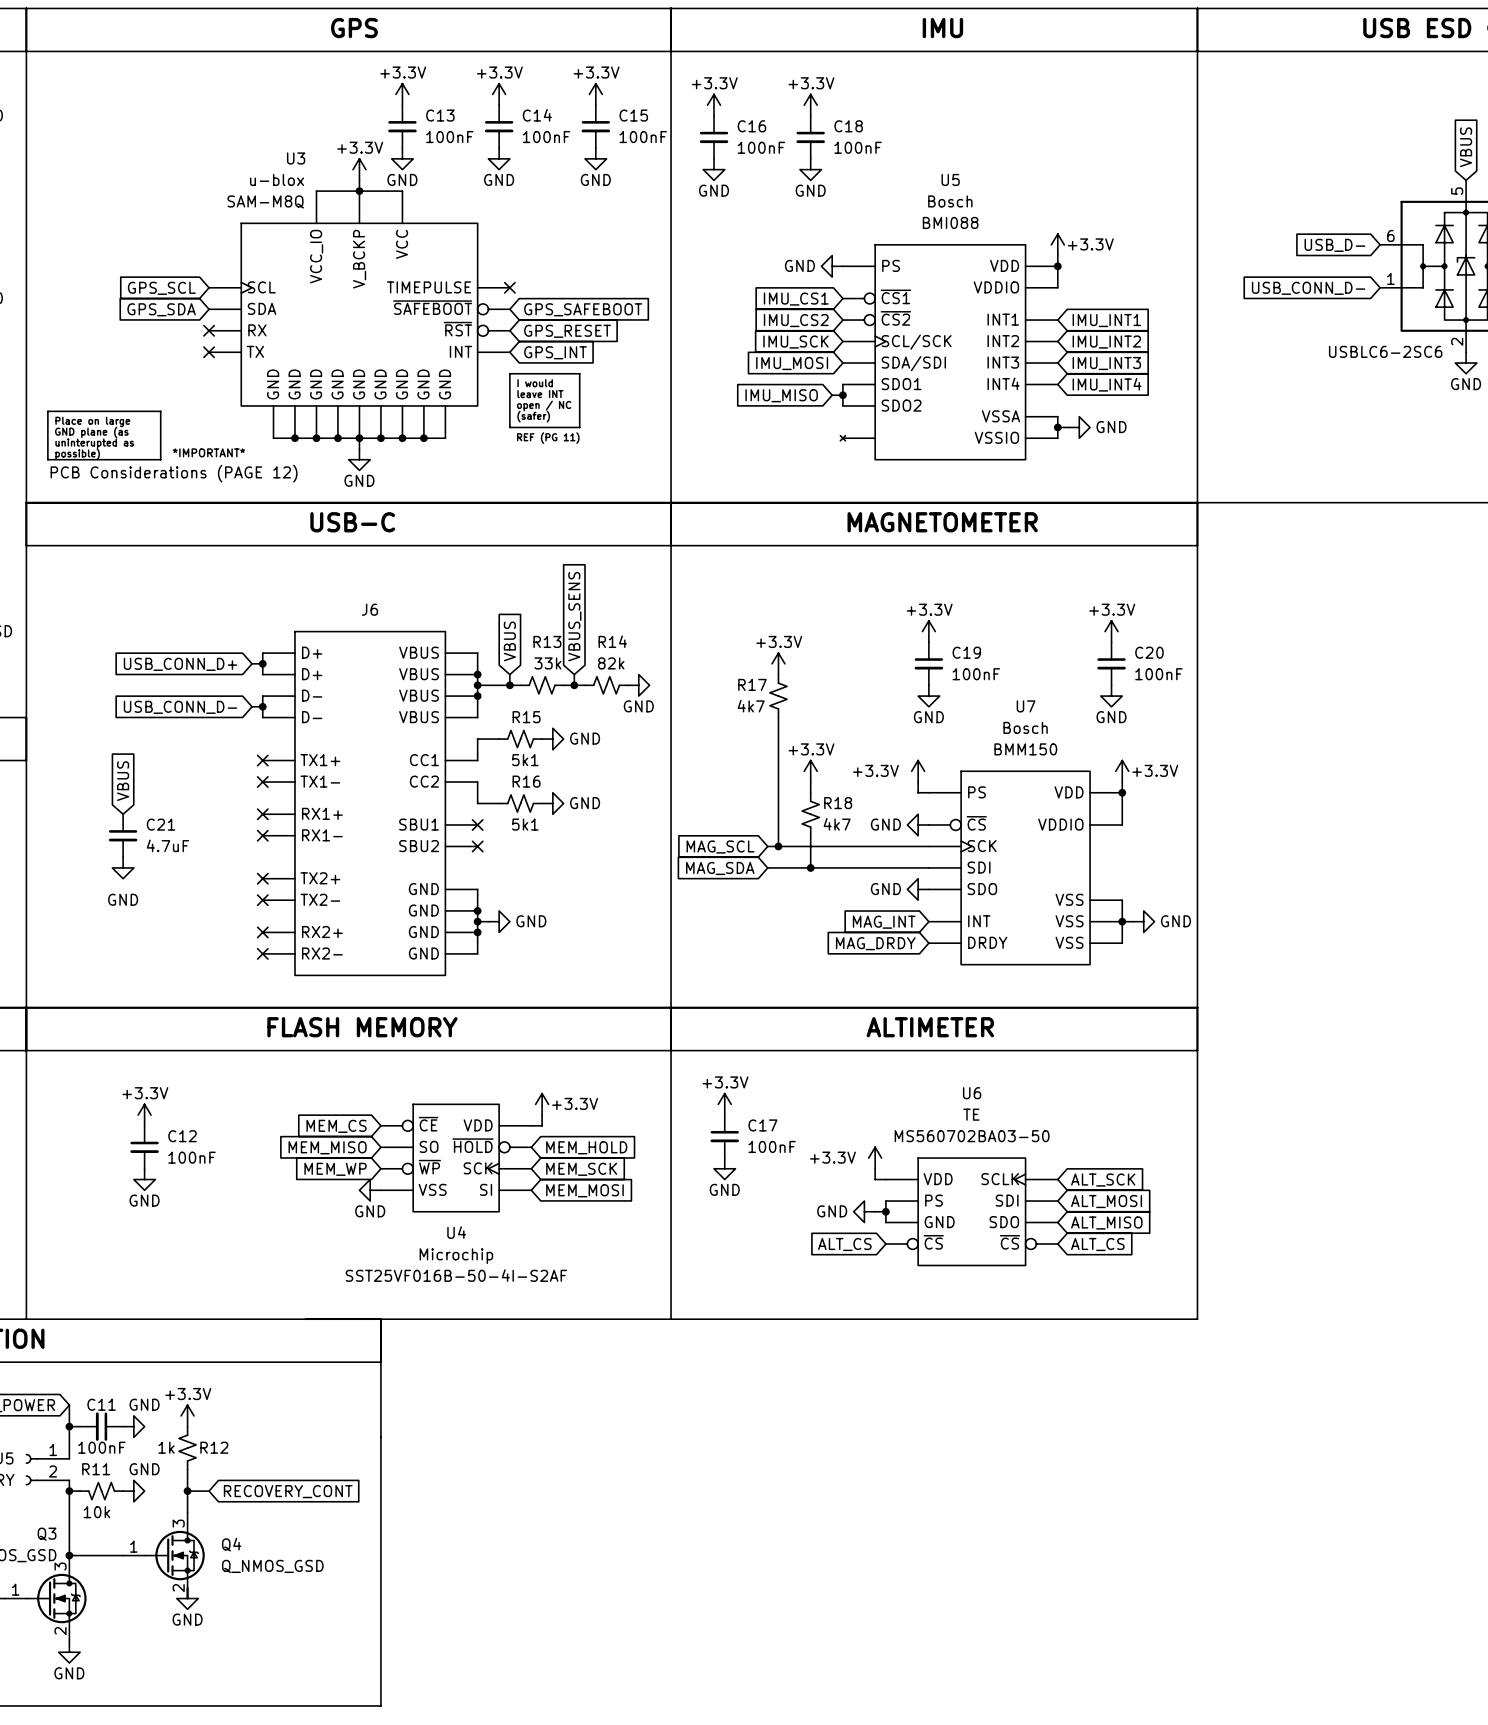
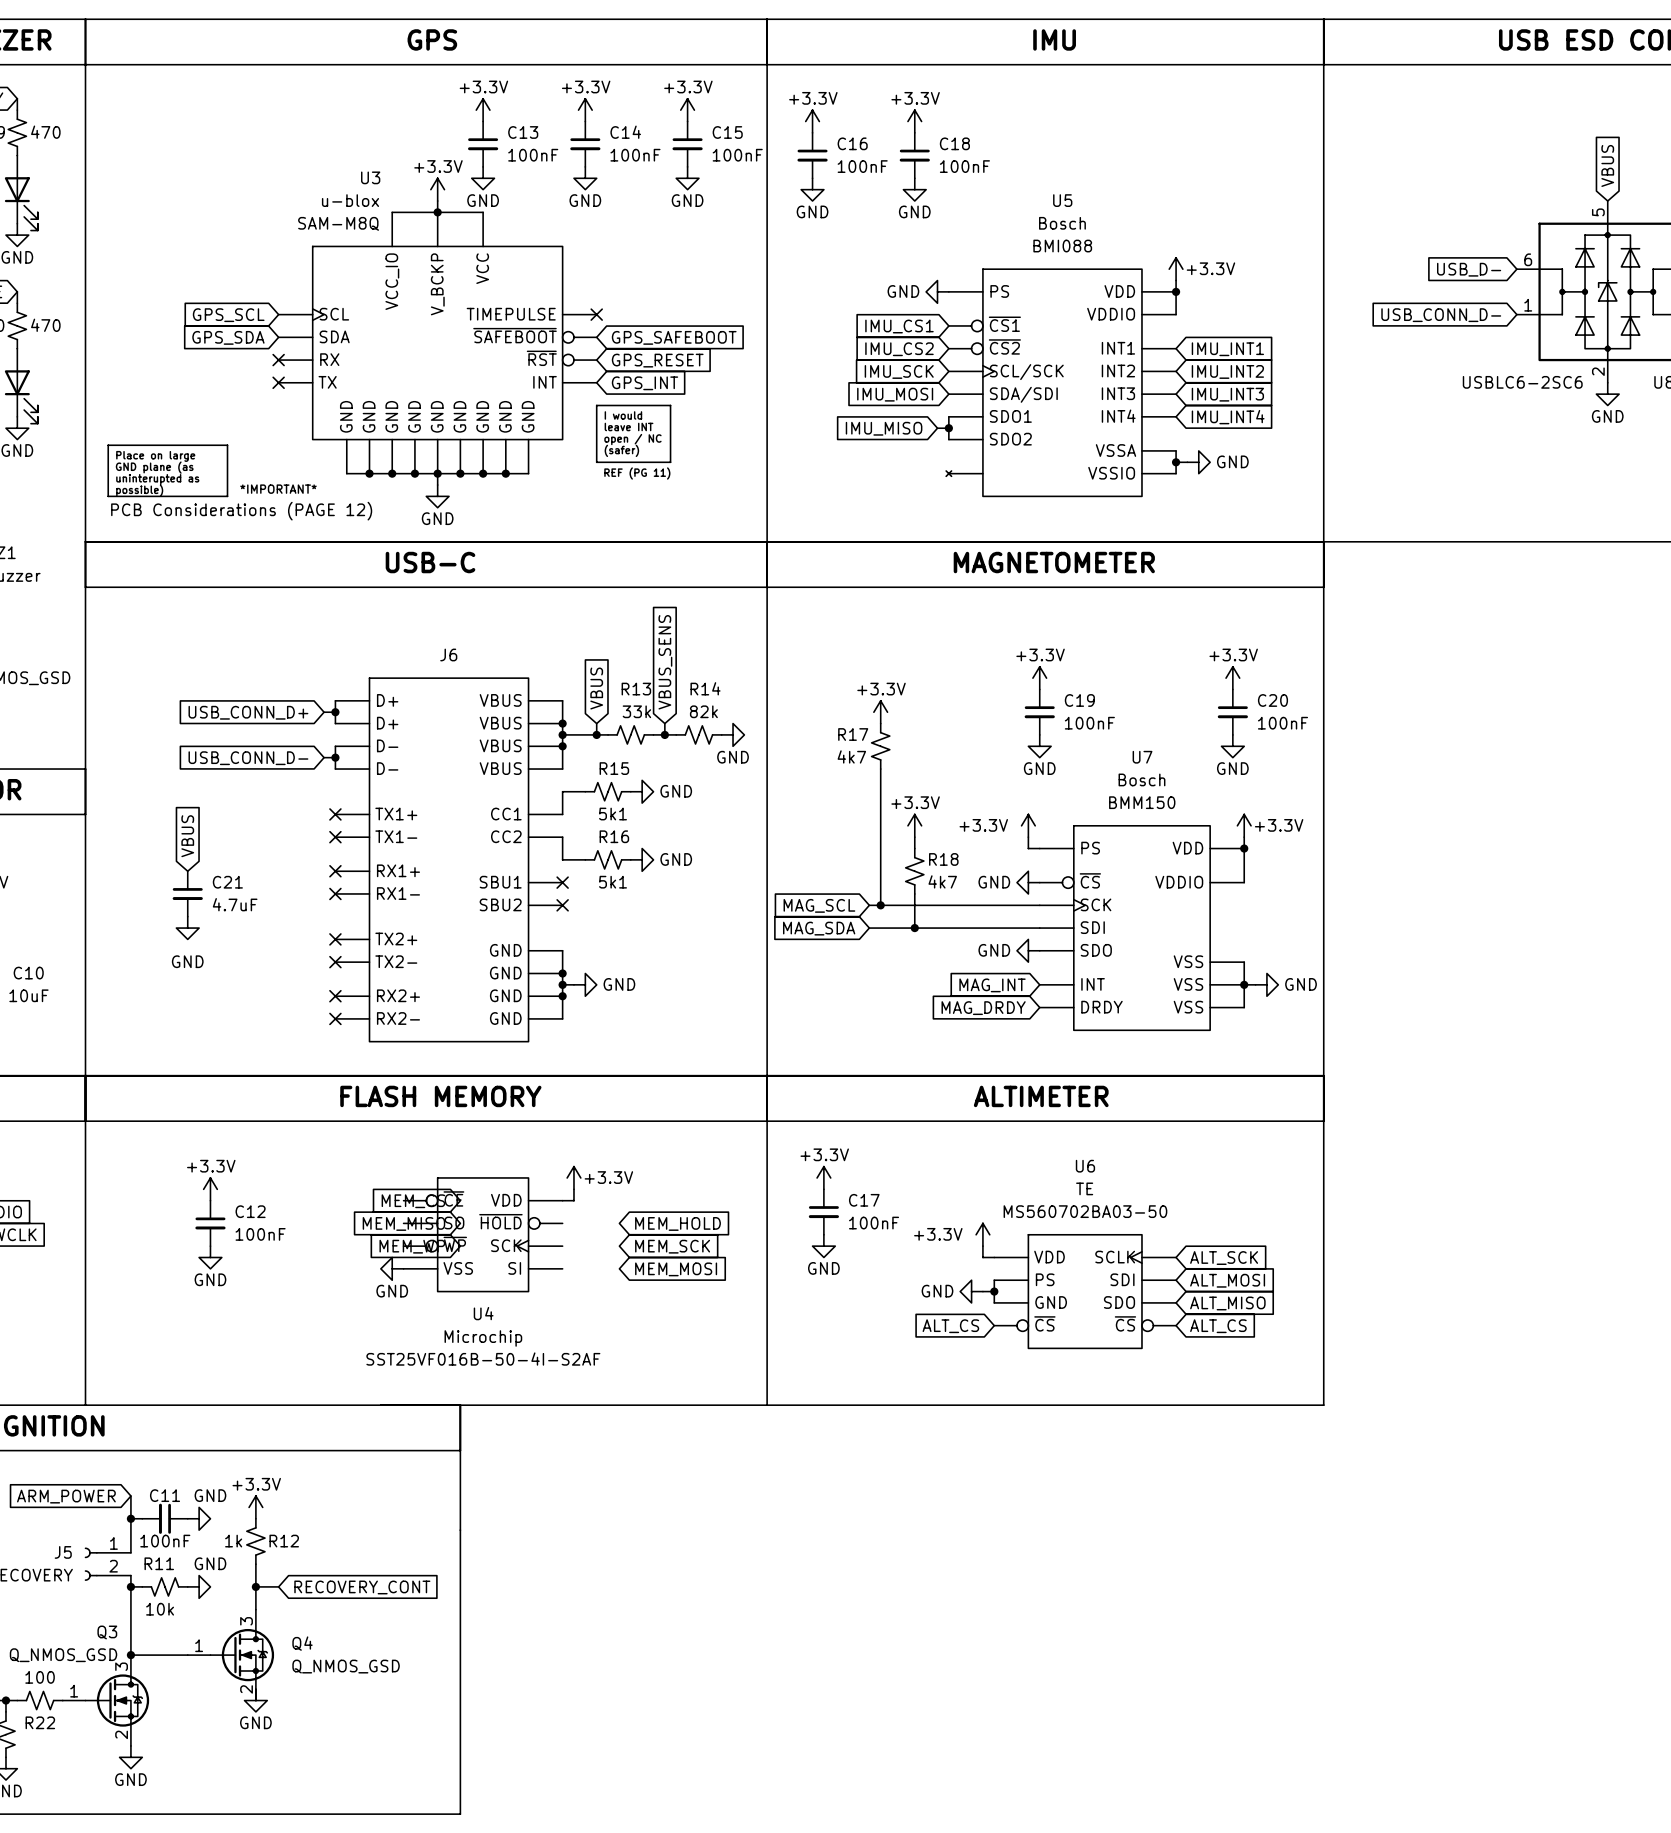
power symbol position: +3.3V (542, 1104) -> +3.3V (573, 1177)
wire: (542, 1115) (542, 1125) (531, 1125) -> (573, 1189) (573, 1200) (562, 1200)
U4 position: (456, 1158) -> (483, 1234)
power symbol position: GND (370, 1190) -> GND (392, 1268)

